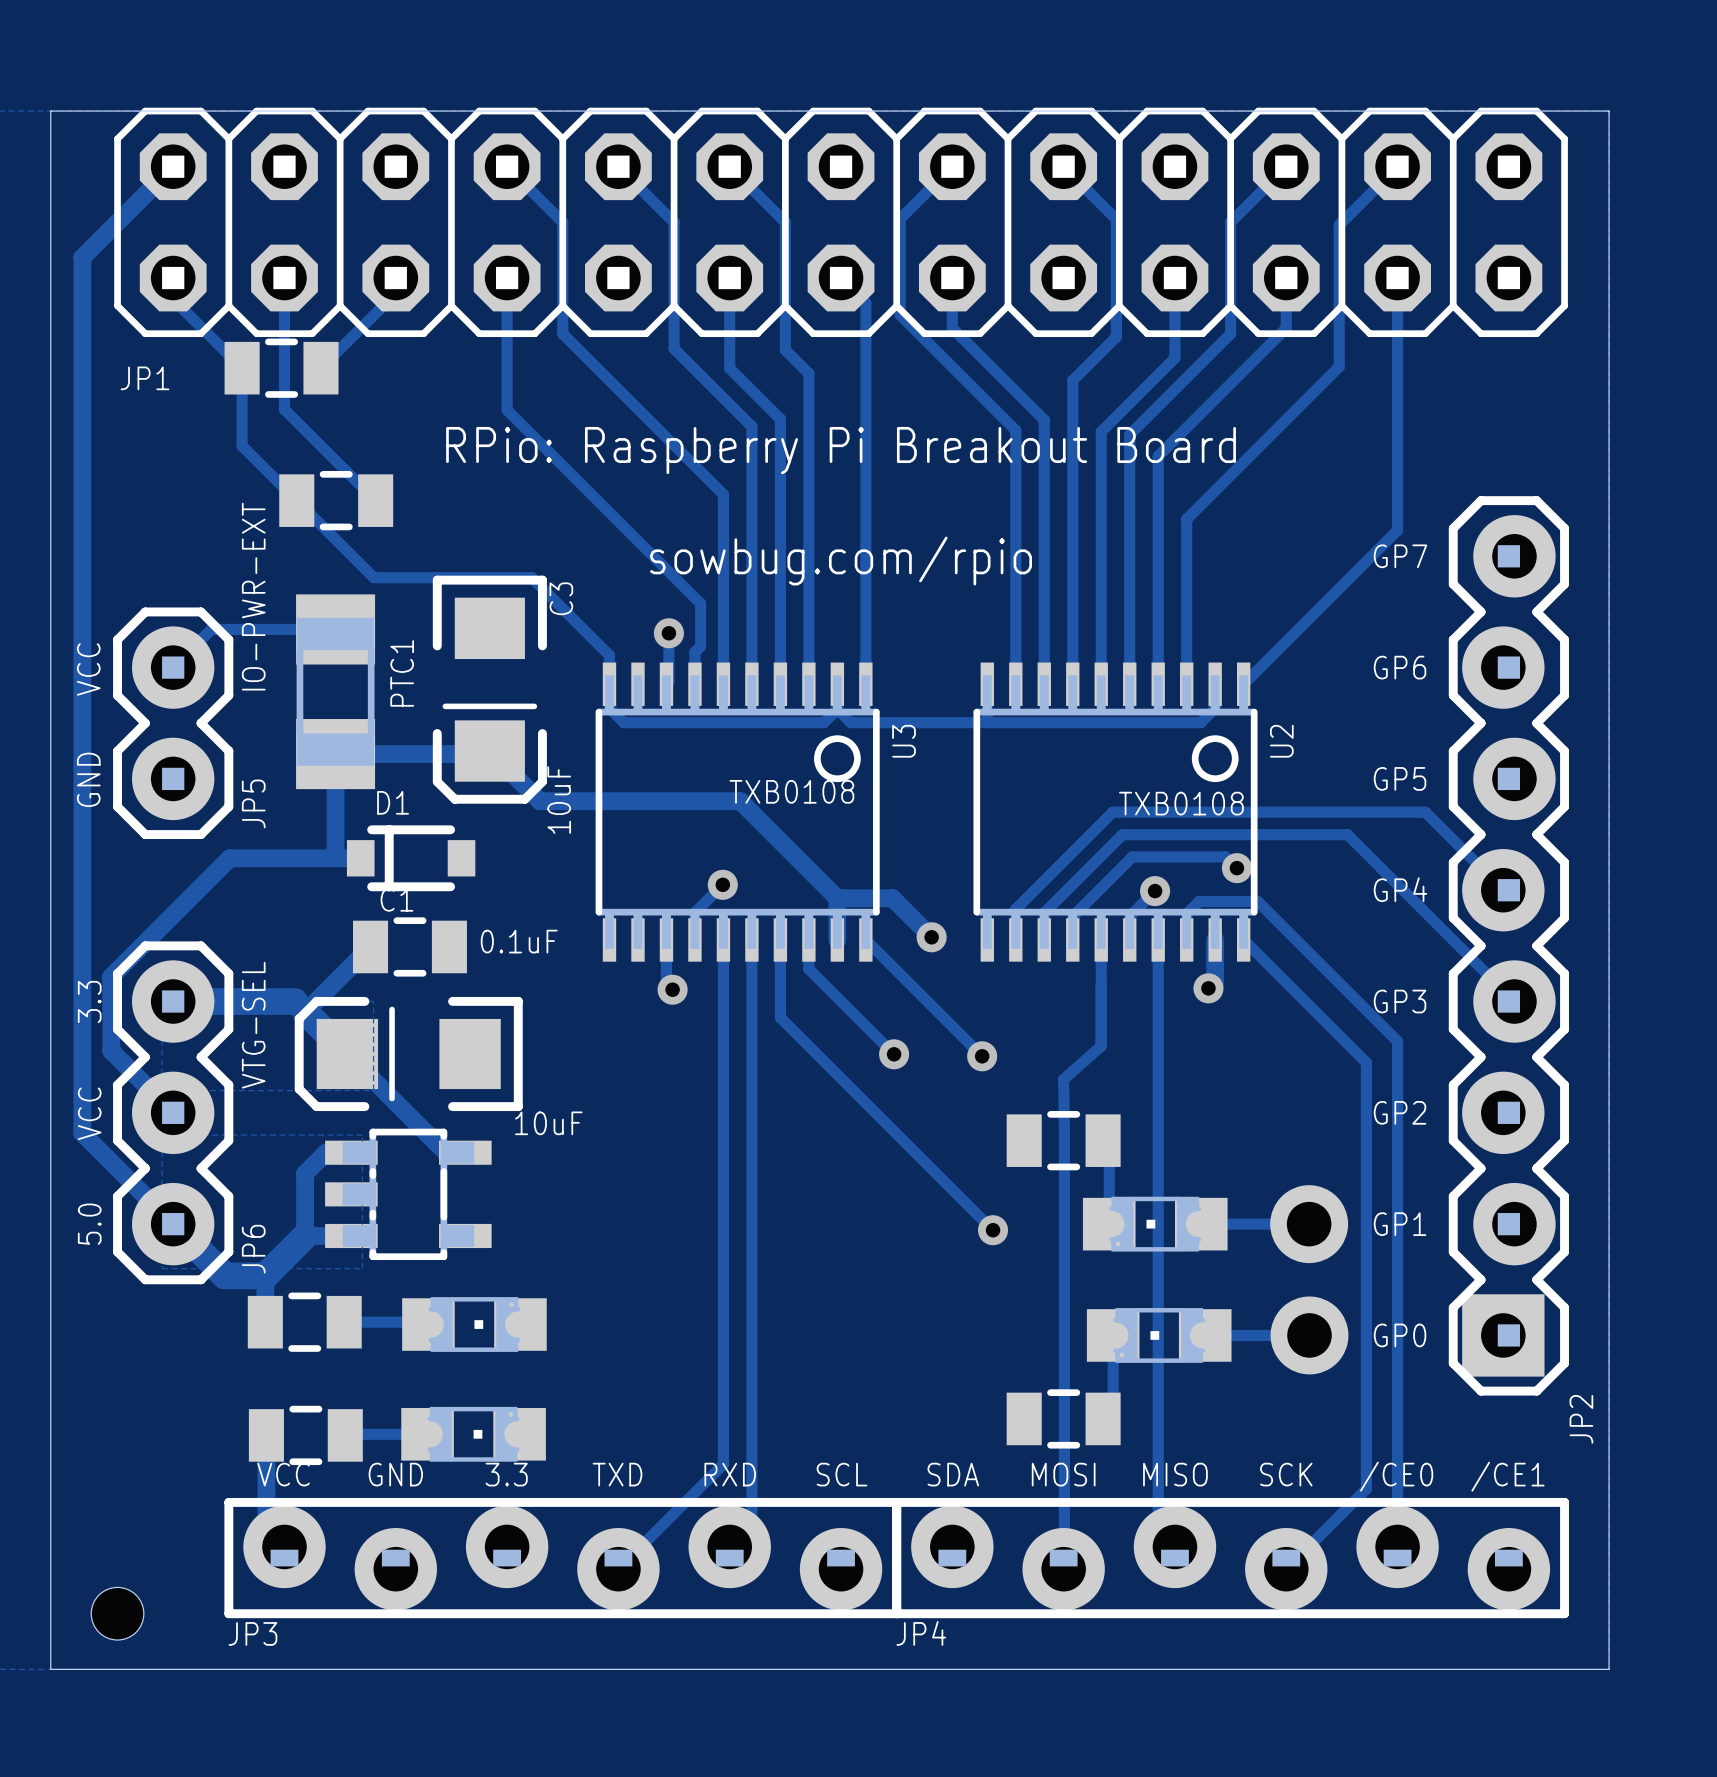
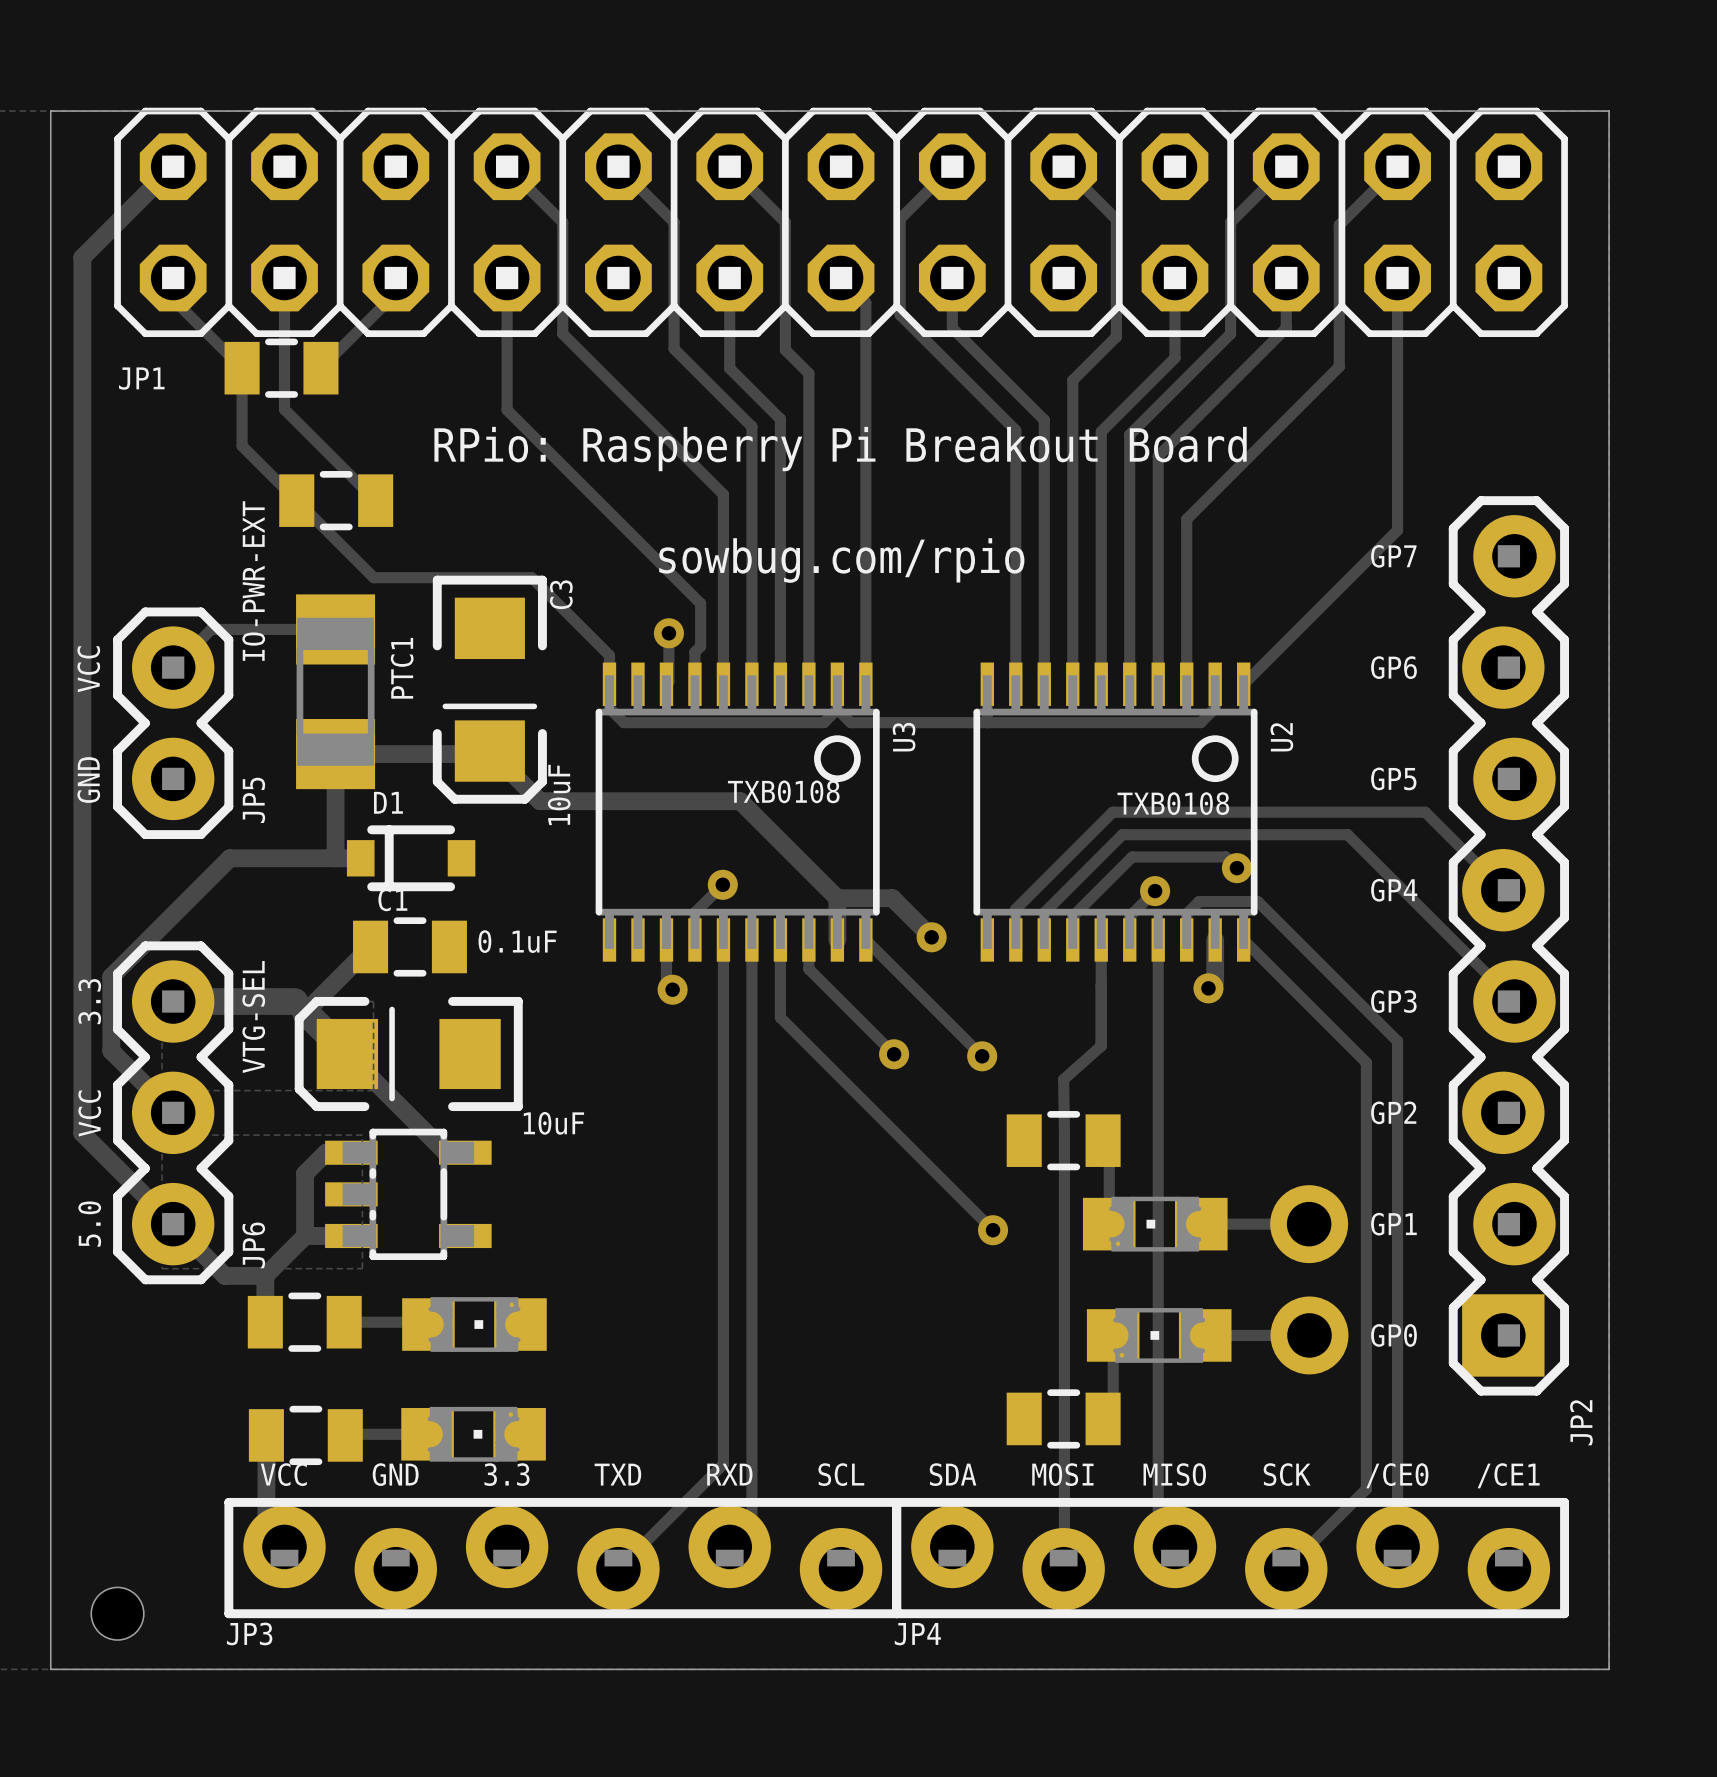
track width: thick (173, 1224) (224, 1275) (265, 1275) (305, 1235) -> thin (173, 1224) (224, 1275) (265, 1275) (305, 1235)

